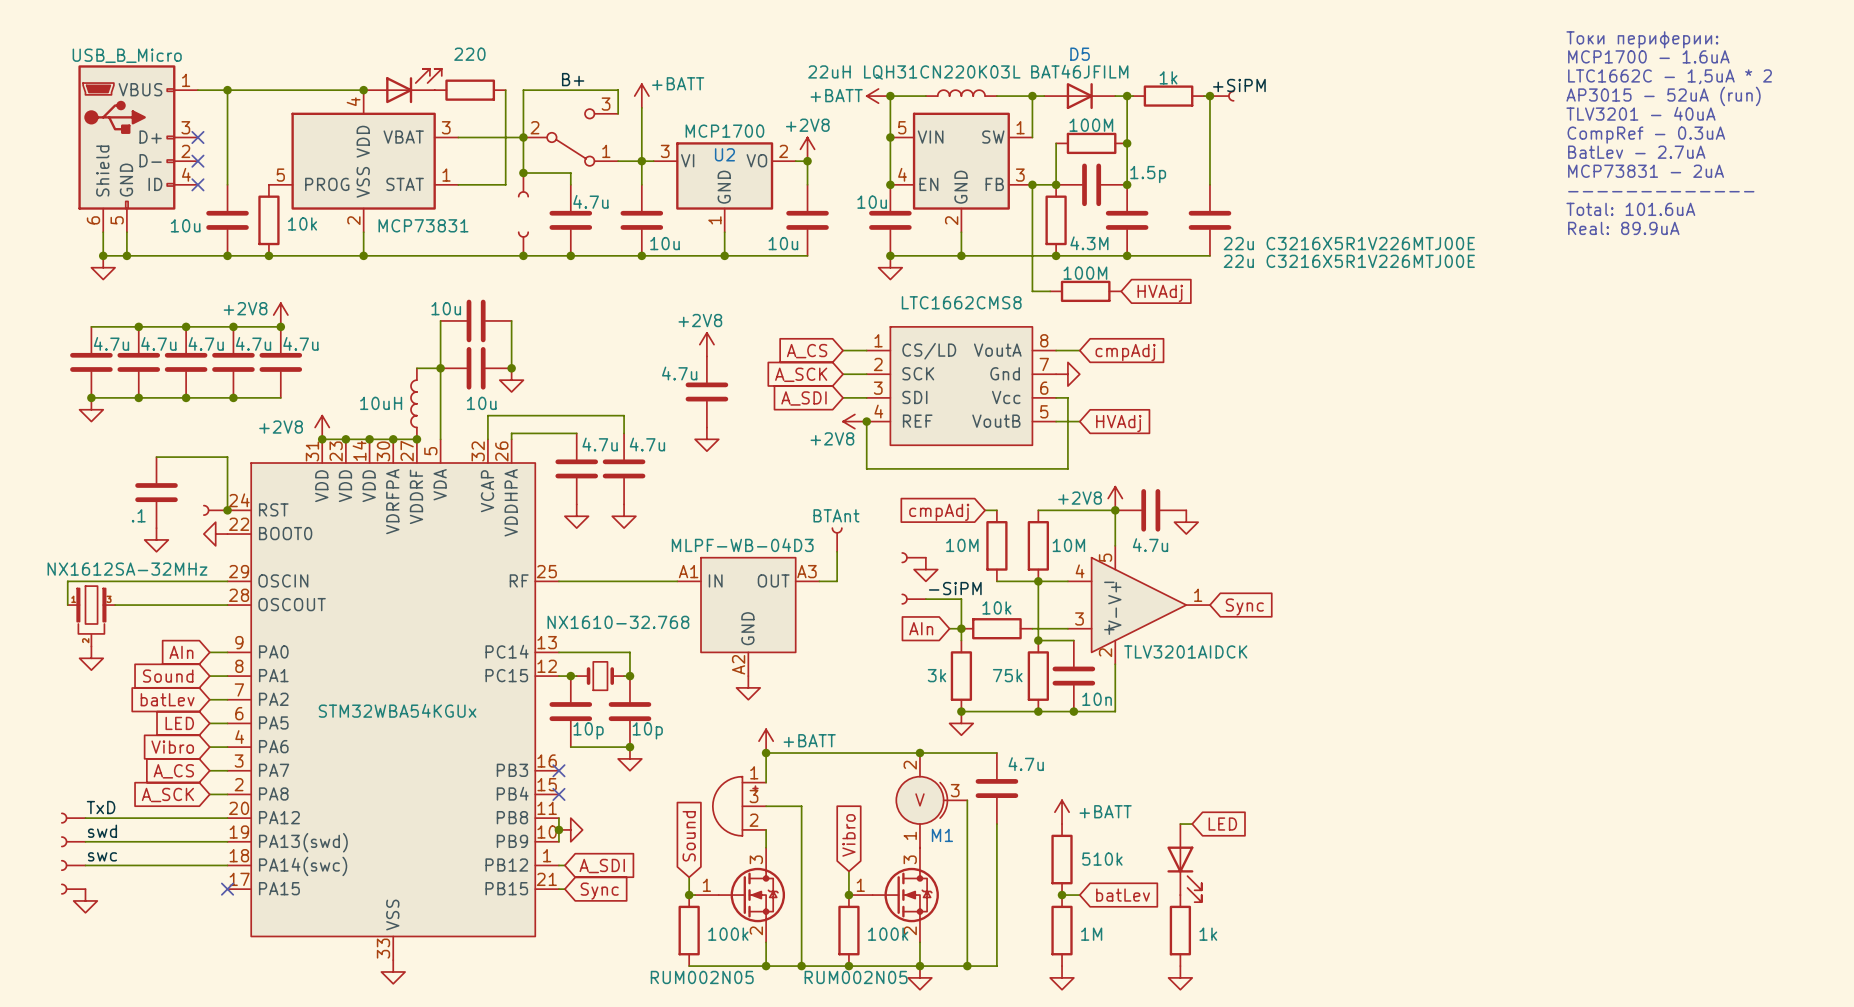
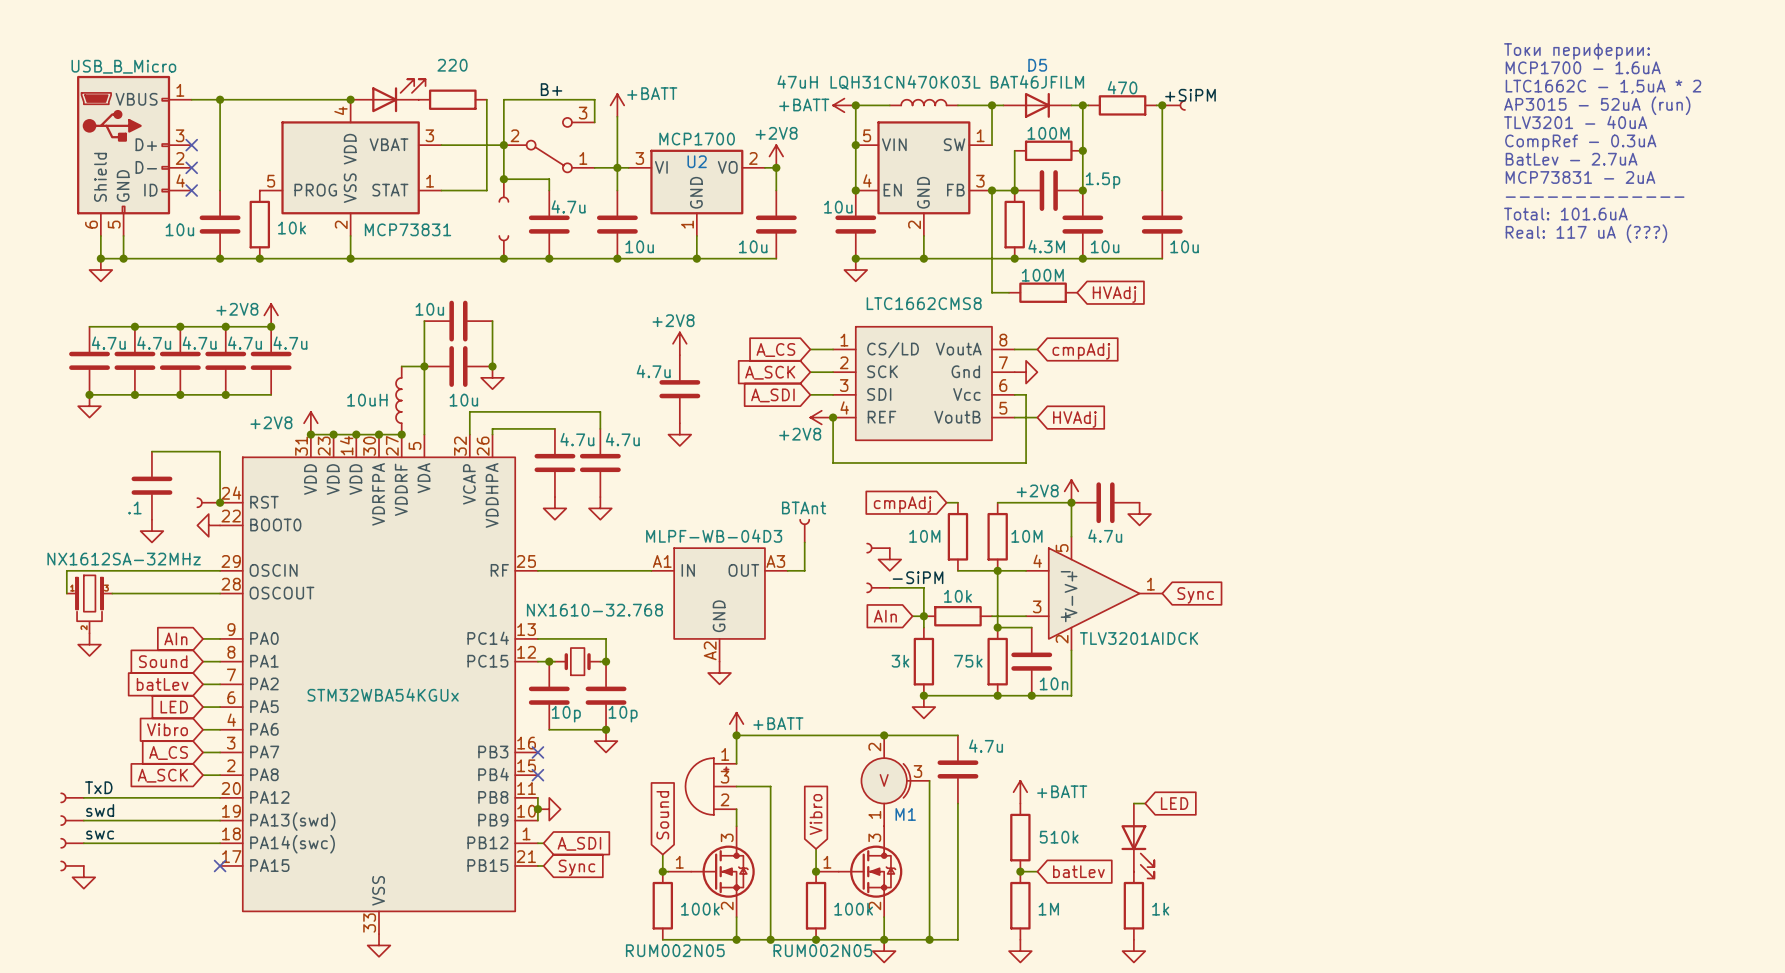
part value: 22uH LQH31CN220K03L (914, 72) -> 47uH LQH31CN470K03L (879, 82)
part value: 1k (1168, 77) -> 470 (1122, 87)
text: Real: 89.9uA (1623, 228) -> Real: 117 uA (???) (1586, 233)
part value: 22u C3216X5R1V226MTJ00E (1349, 243) -> 10u (1184, 246)
part value: 22u C3216X5R1V226MTJ00E (1349, 261) -> 10u (1105, 246)

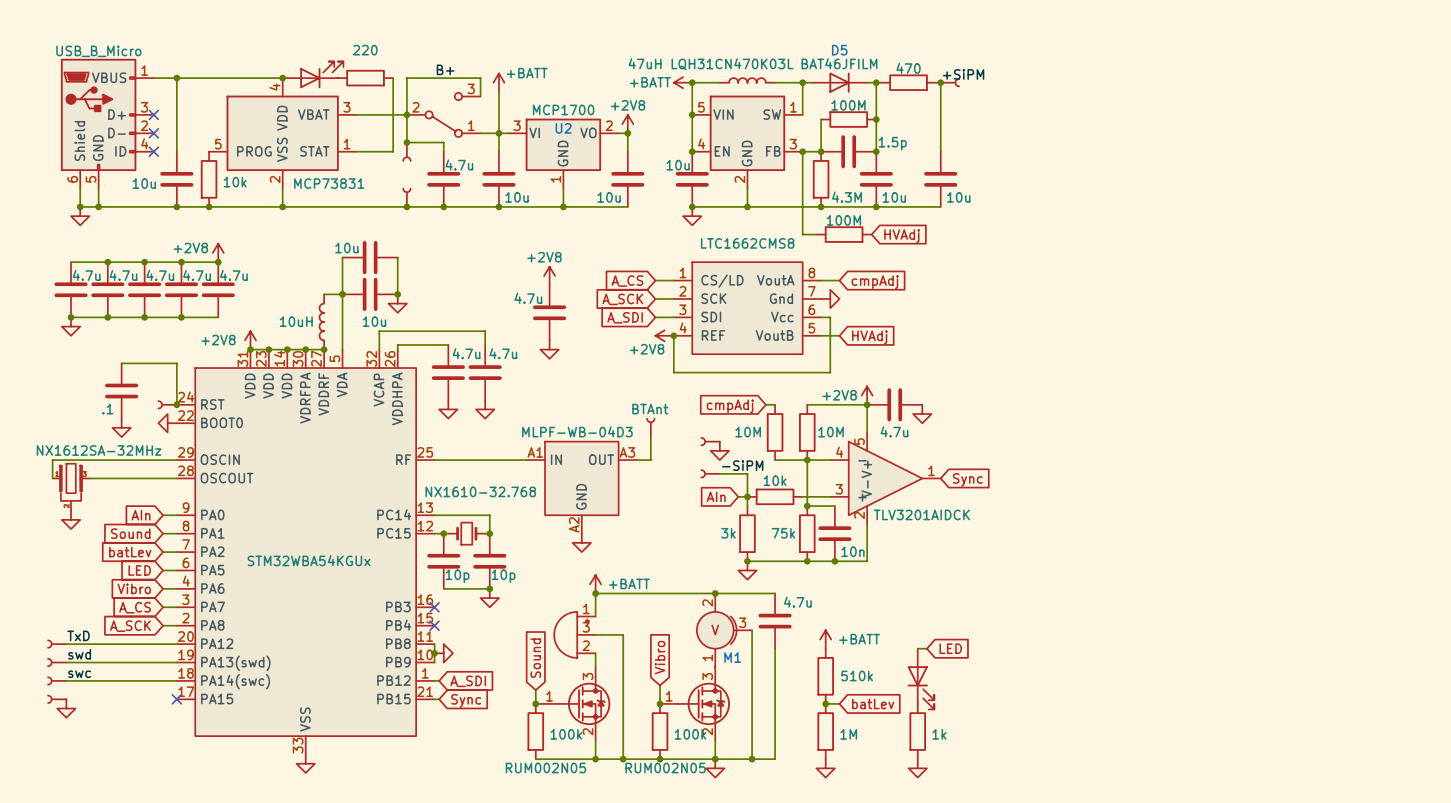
text: Токи периферии: (1576, 51) -> none
text: MCP1700 - 1.6uA (1583, 67) -> none
text: LTC1662C - 1,5uA * 2 (1603, 86) -> none
text: AP3015 - 52uA (run) (1597, 105) -> none
text: TLV3201 - 40uA (1575, 122) -> none
text: CompRef - 0.3uA (1580, 142) -> none
text: BatLev - 2.7uA (1571, 159) -> none
text: MCP73831 - 2uA (1580, 177) -> none
text: ------------- (1595, 197) -> none
text: Total: 101.6uA (1565, 214) -> none
text: Real: 117 uA (???) (1586, 233) -> none

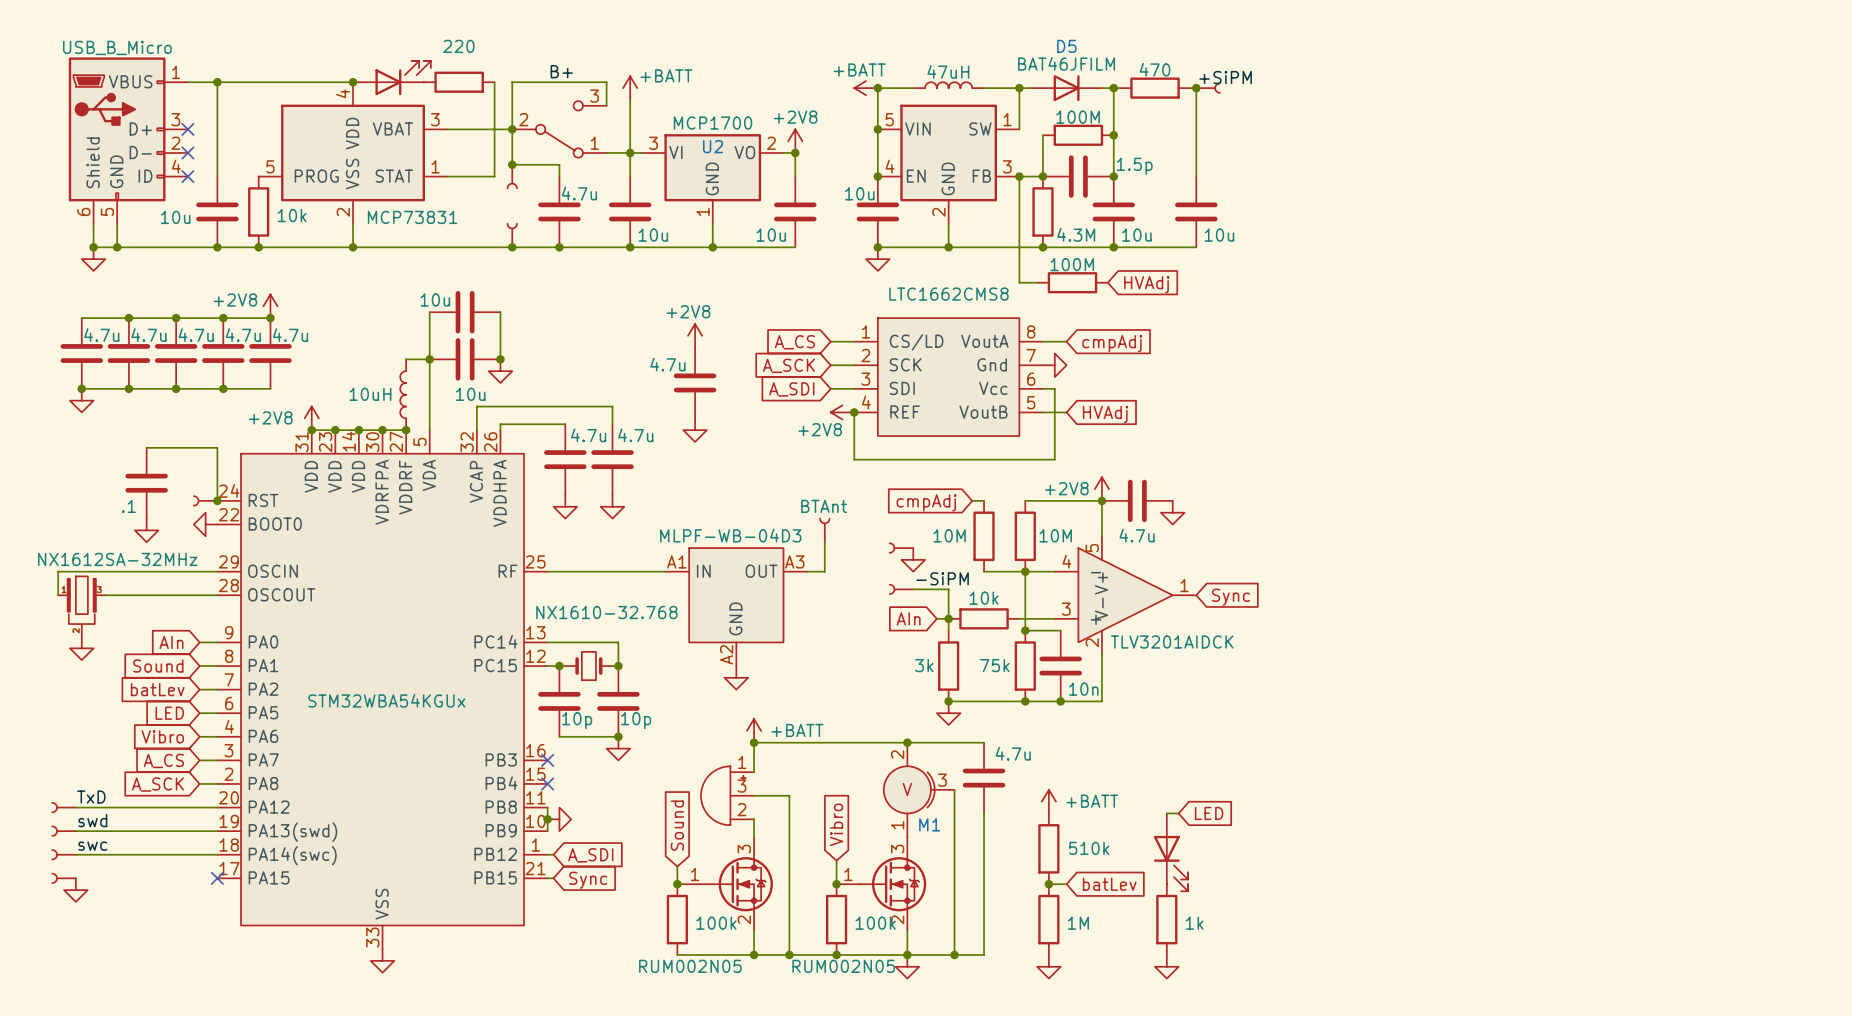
part value: 47uH LQH31CN470K03L (711, 64) -> 47uH (948, 71)
power symbol text position: +BATT (650, 82) -> +BATT (859, 69)

